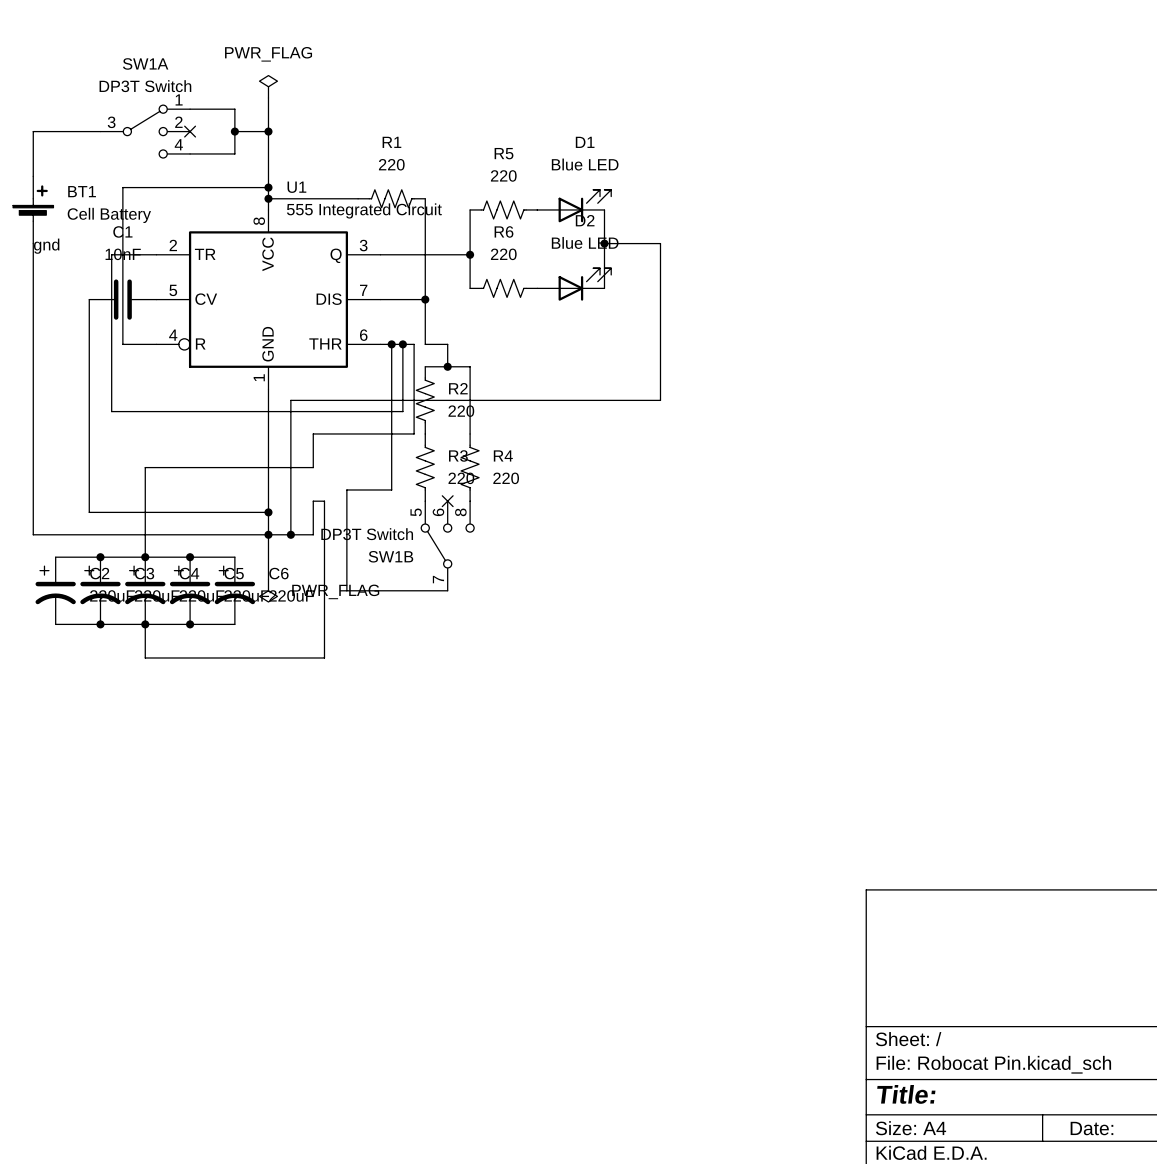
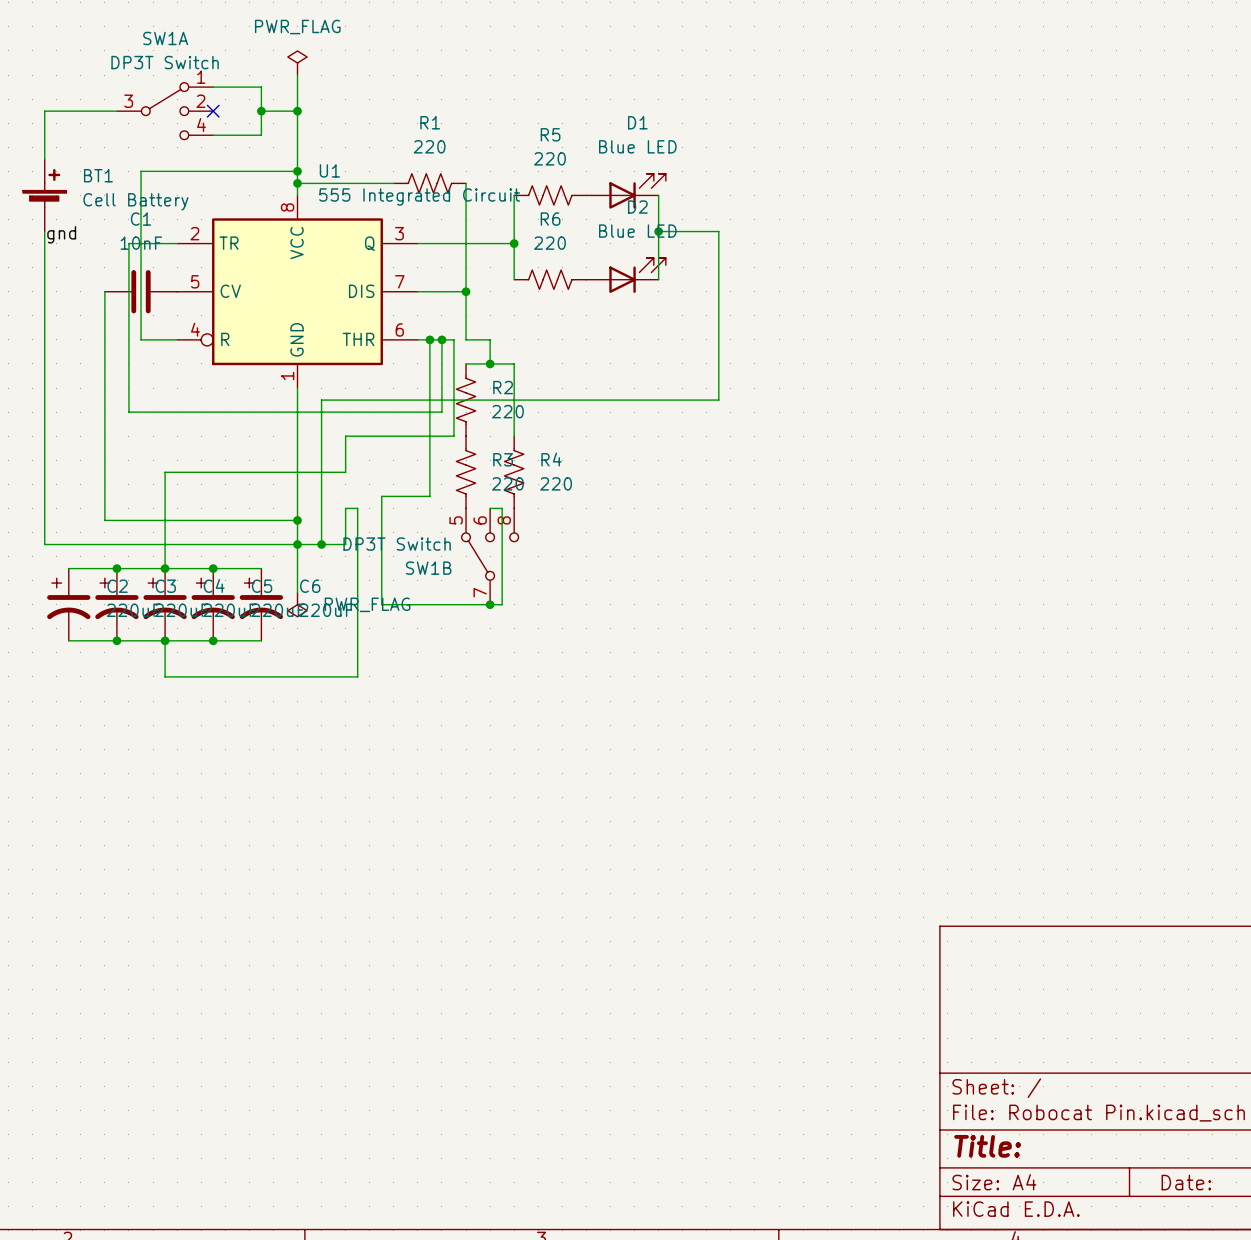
wire: none -> (490, 508) (502, 508) (502, 604) (490, 604)
no-connect mark: (447, 501) -> none
junction: none -> (490, 604)

